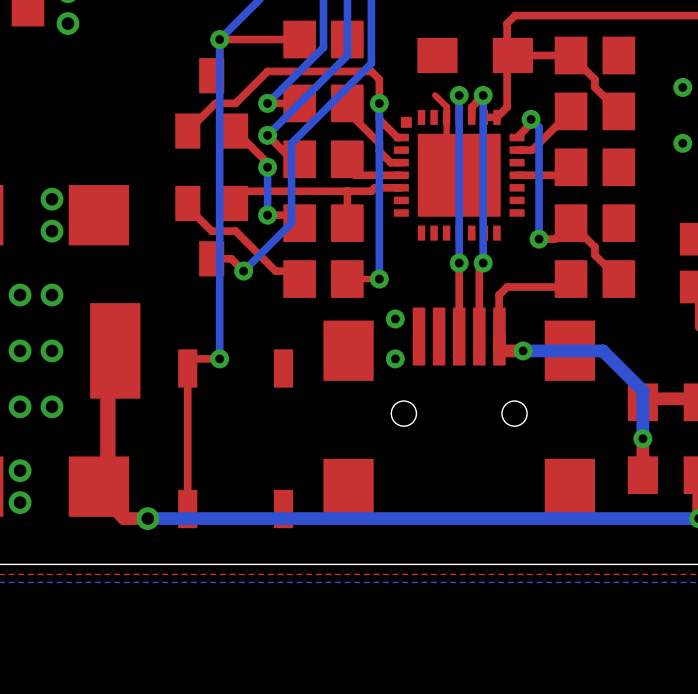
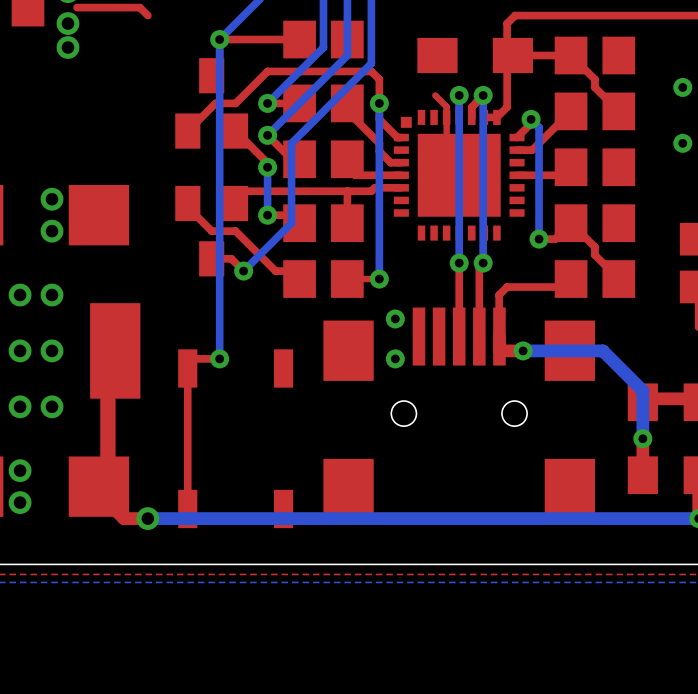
top track: none -> (77, 7) (139, 7) (147, 15)
via: none -> (67, 47)

